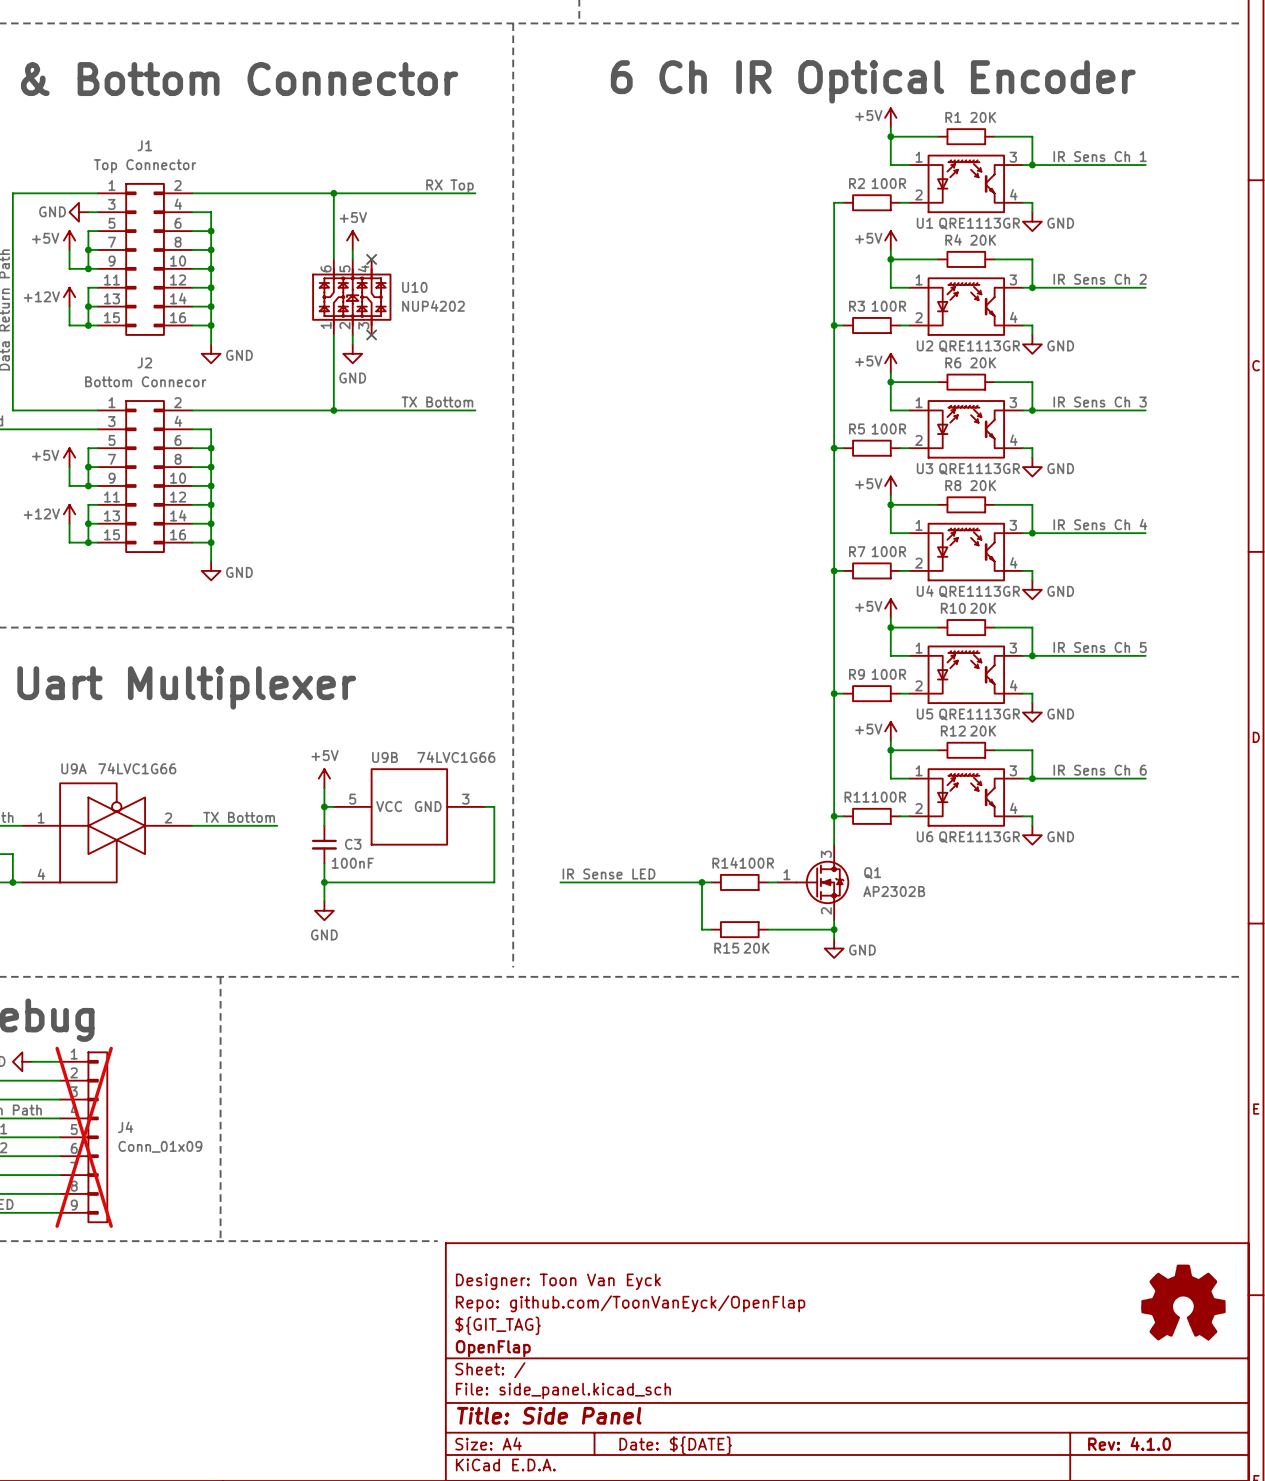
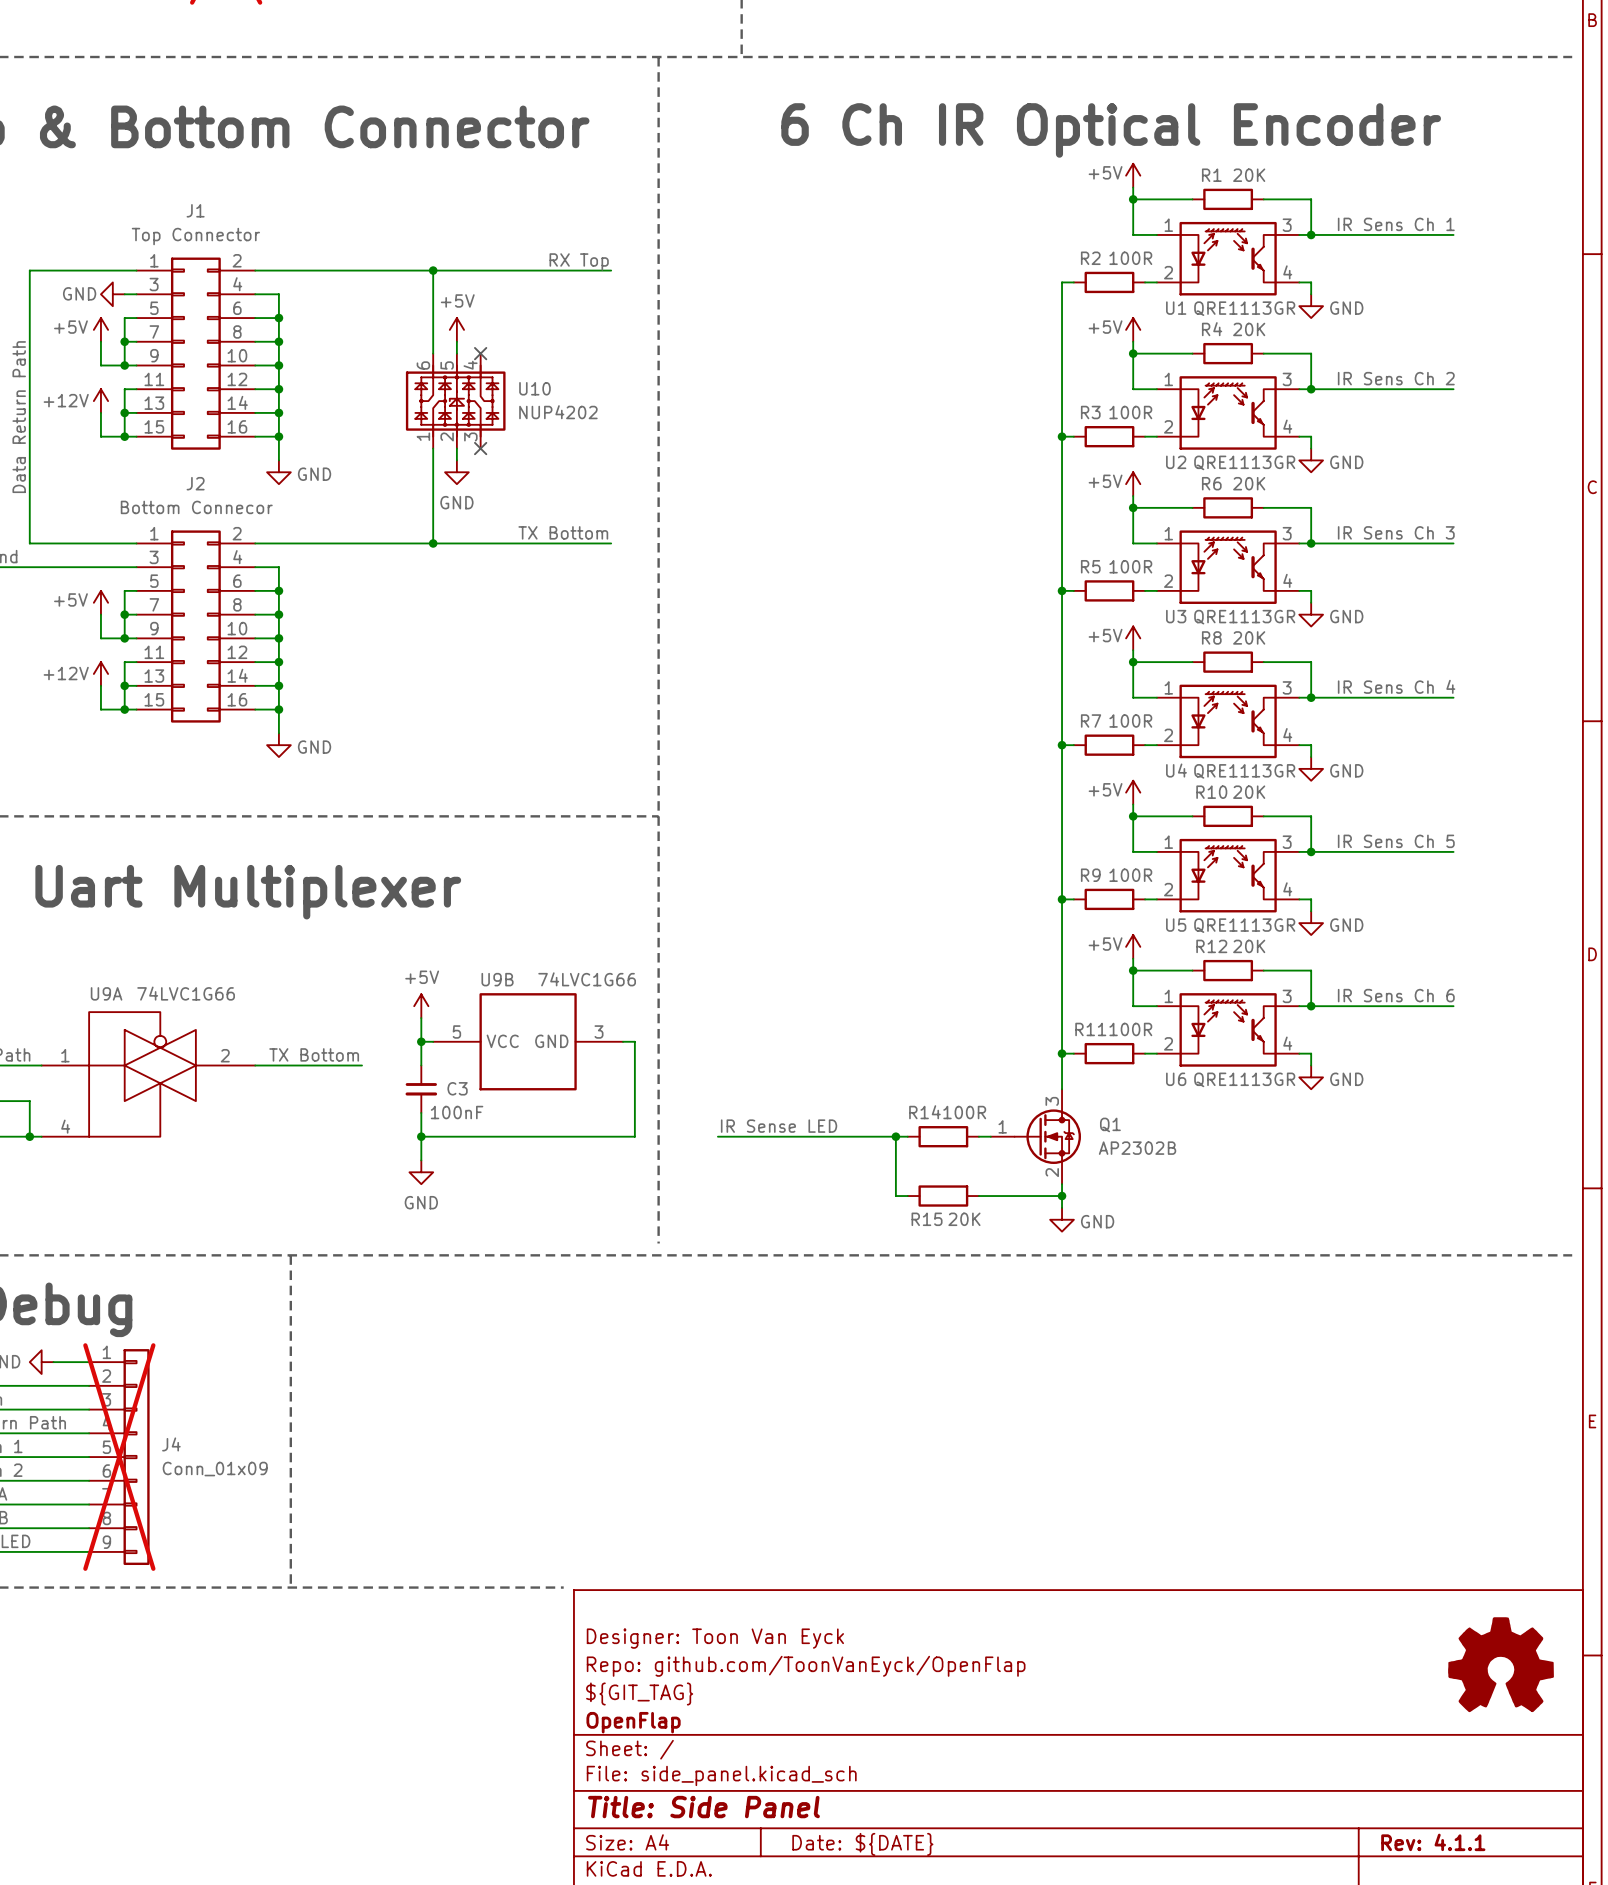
title block: Rev: 4.1.0 (1129, 1443) -> Rev: 4.1.1 (1433, 1842)

